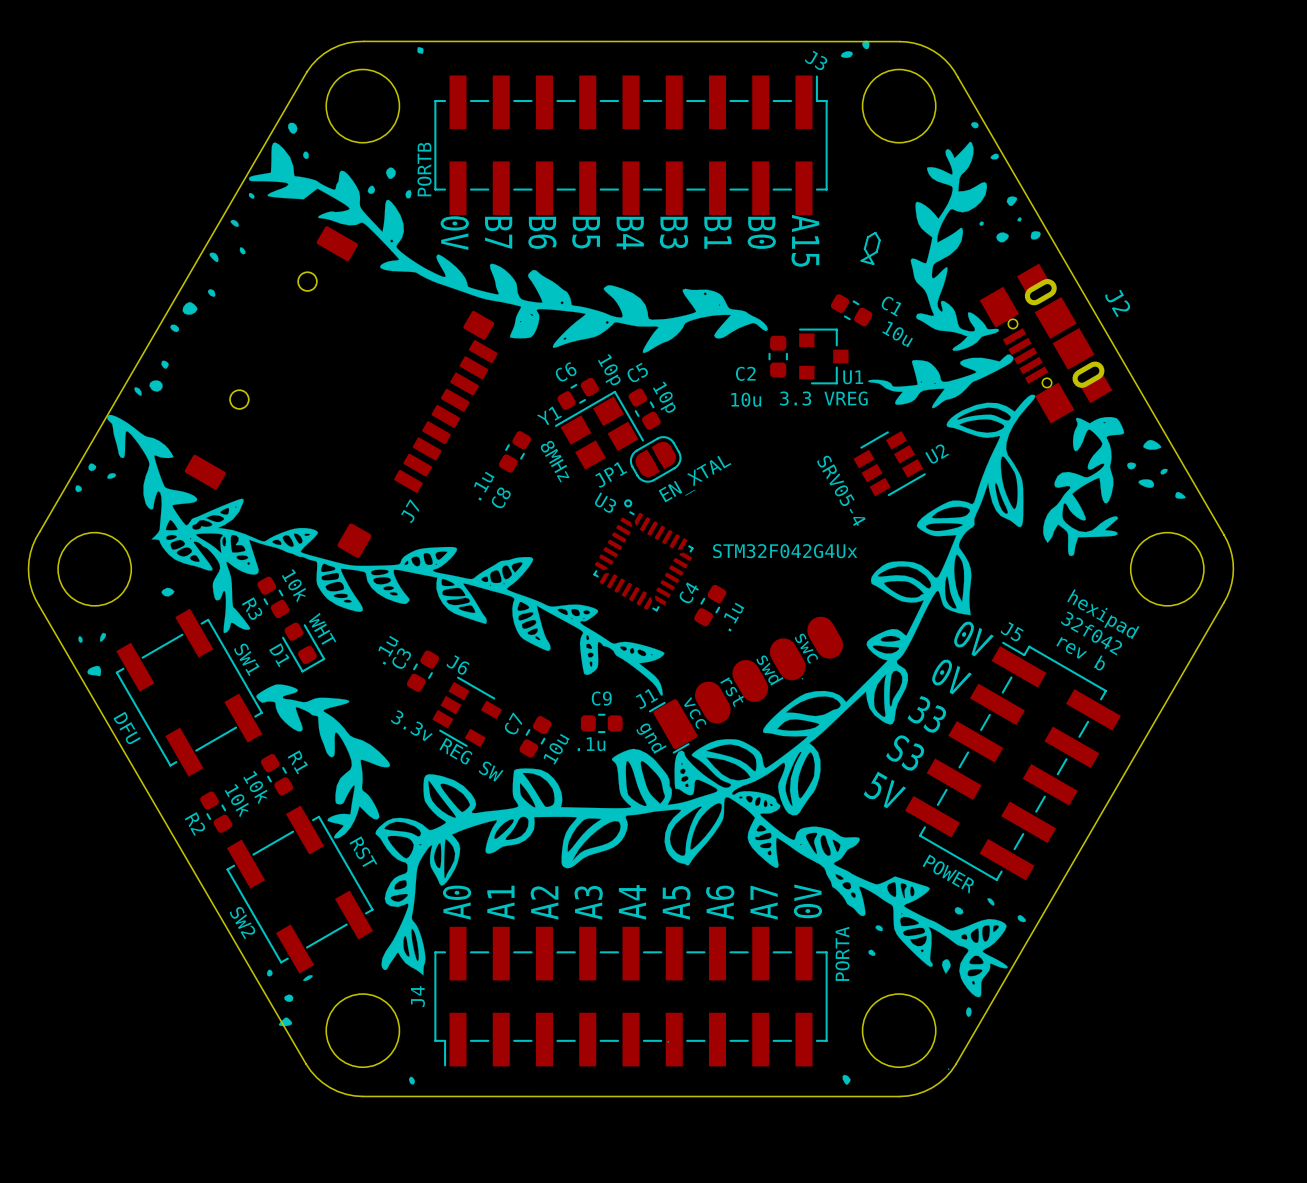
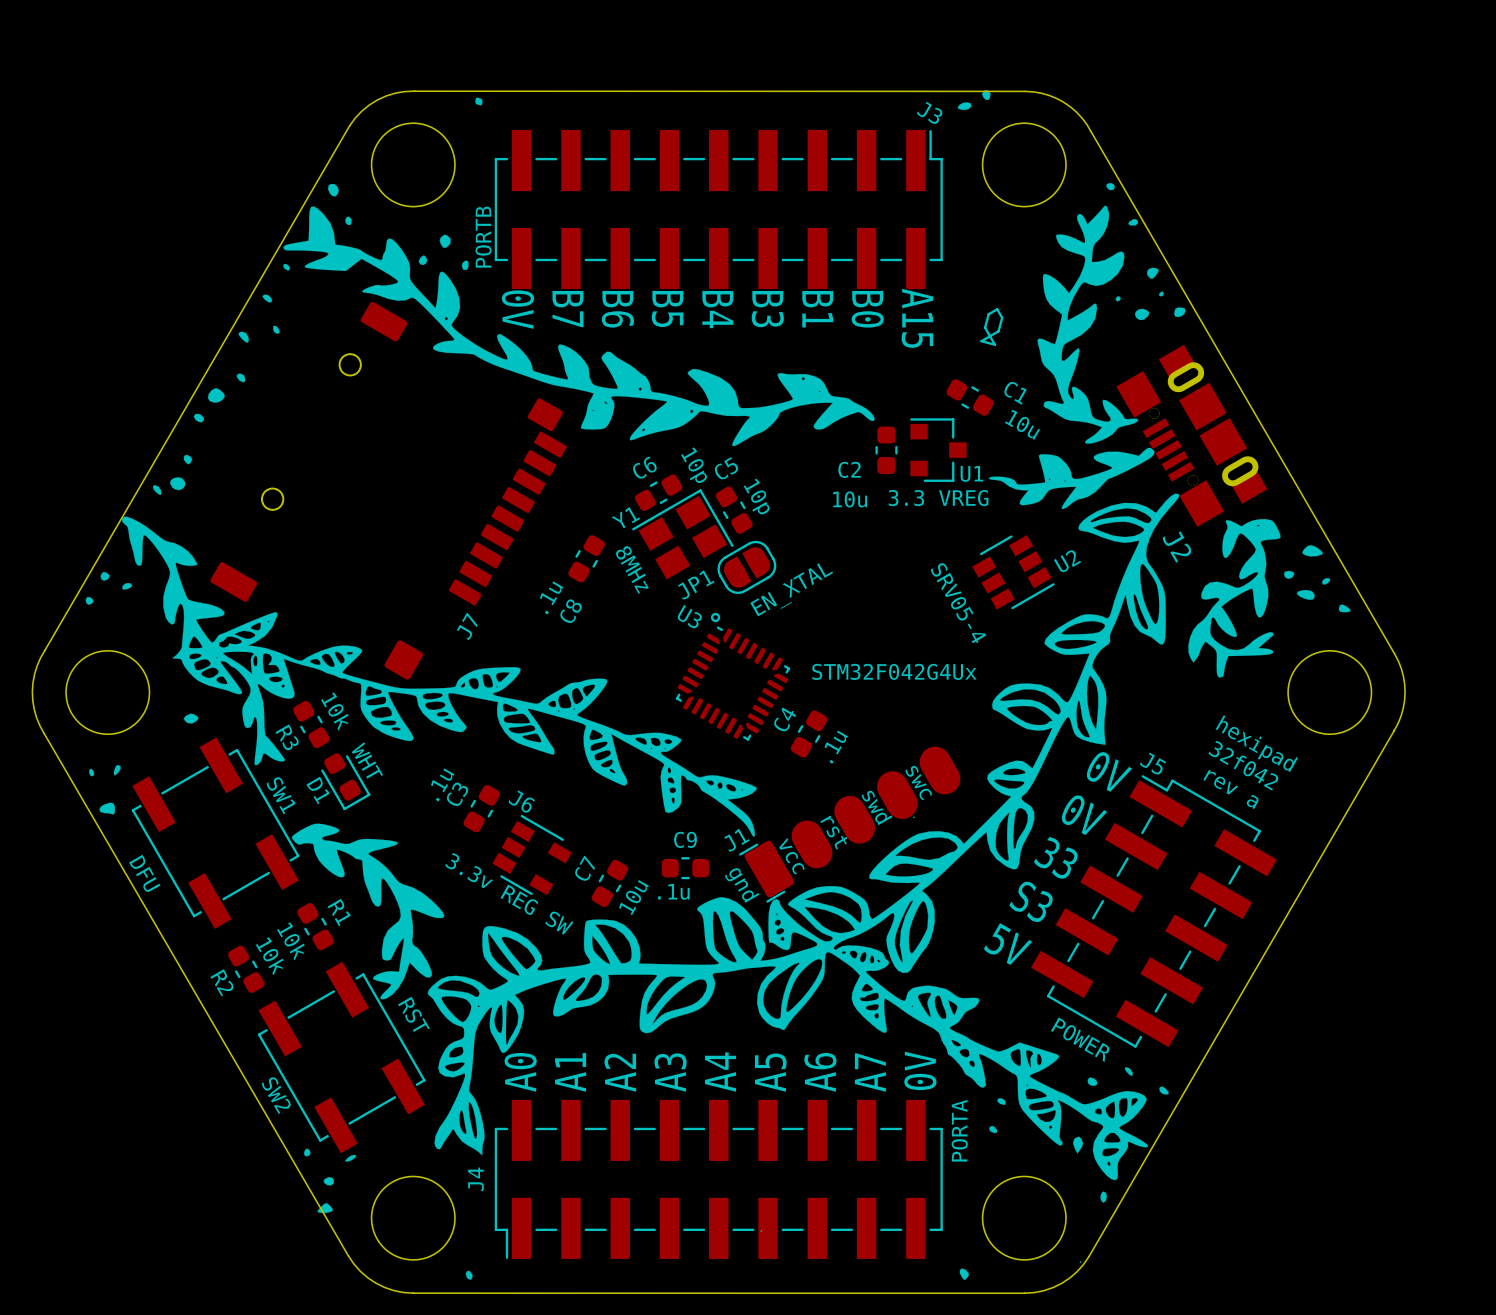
J2 footprint: [979, 263, 1113, 424] -> [1116, 344, 1268, 527]
J2 name position: J2 (1117, 303) -> J2 (1177, 547)
text: rev b (1080, 653) -> rev a (1230, 789)

